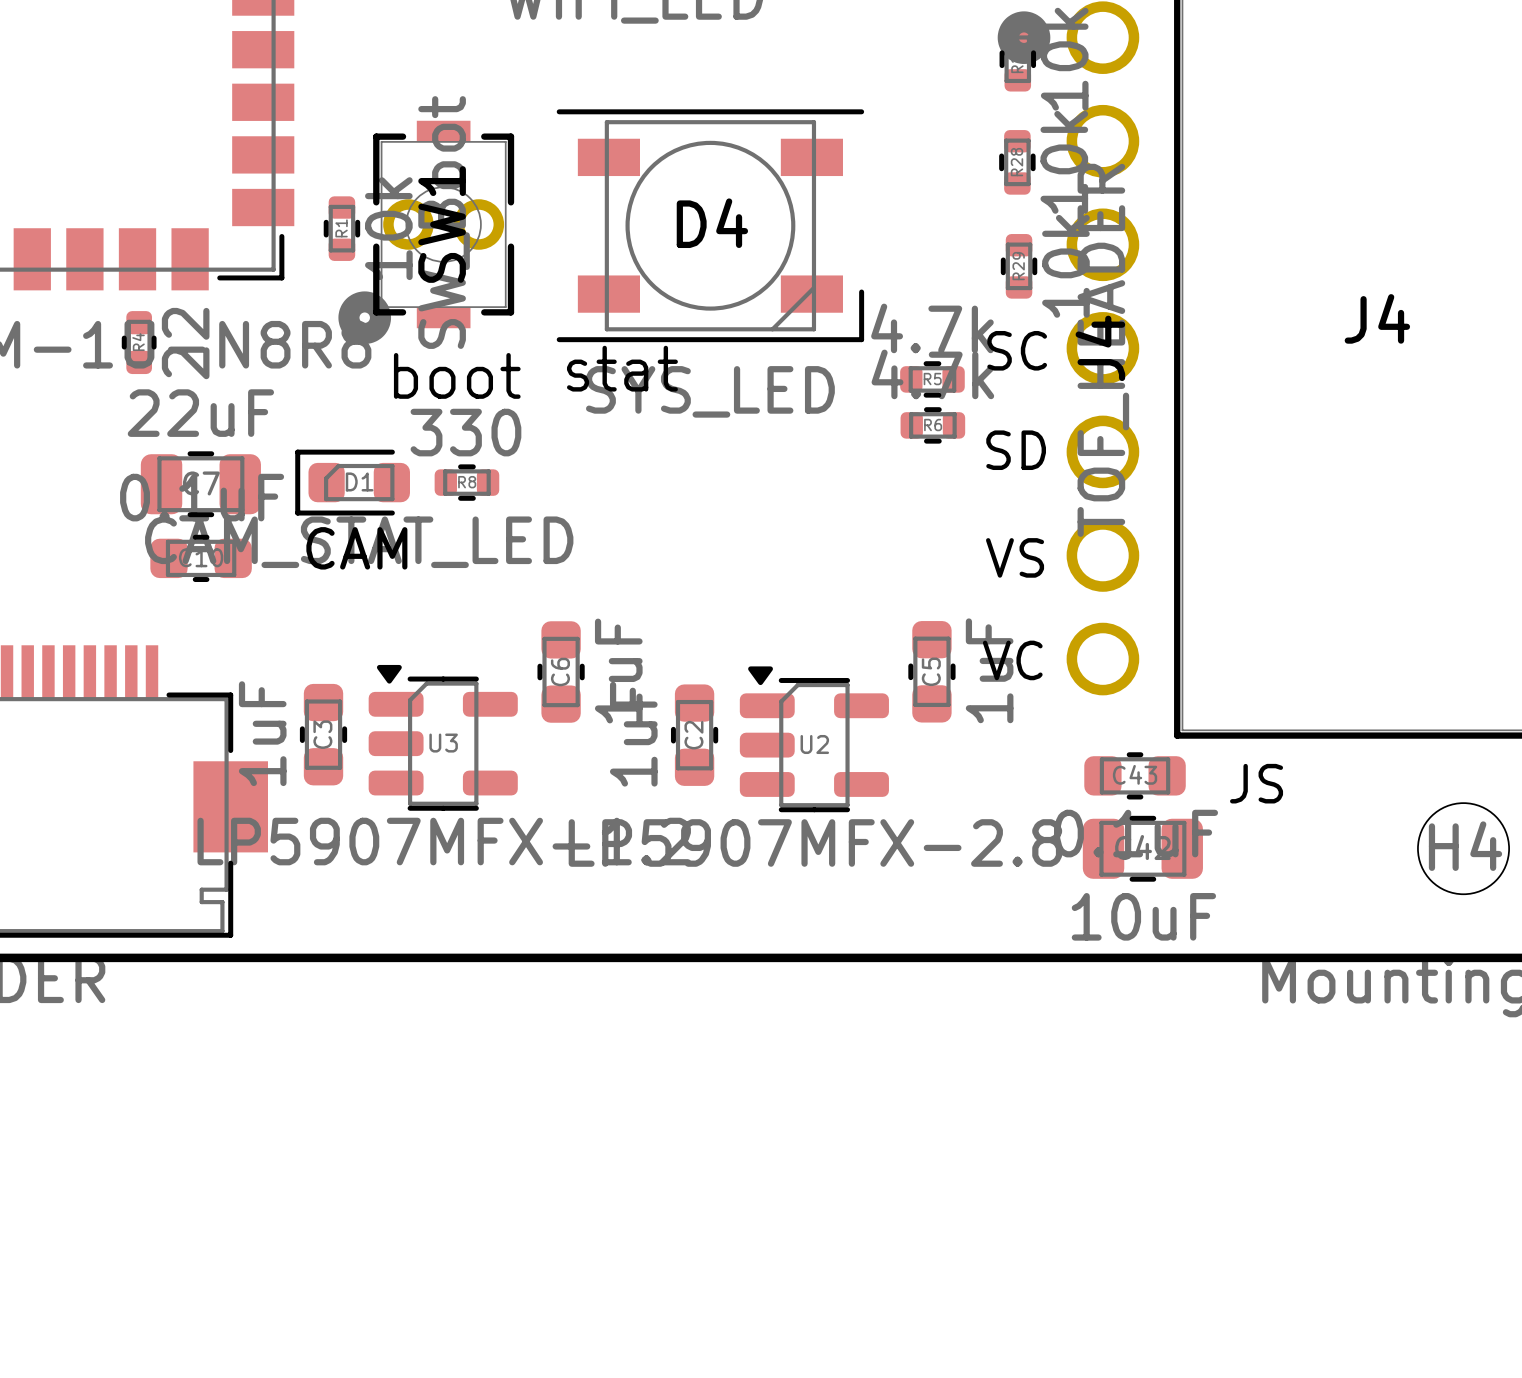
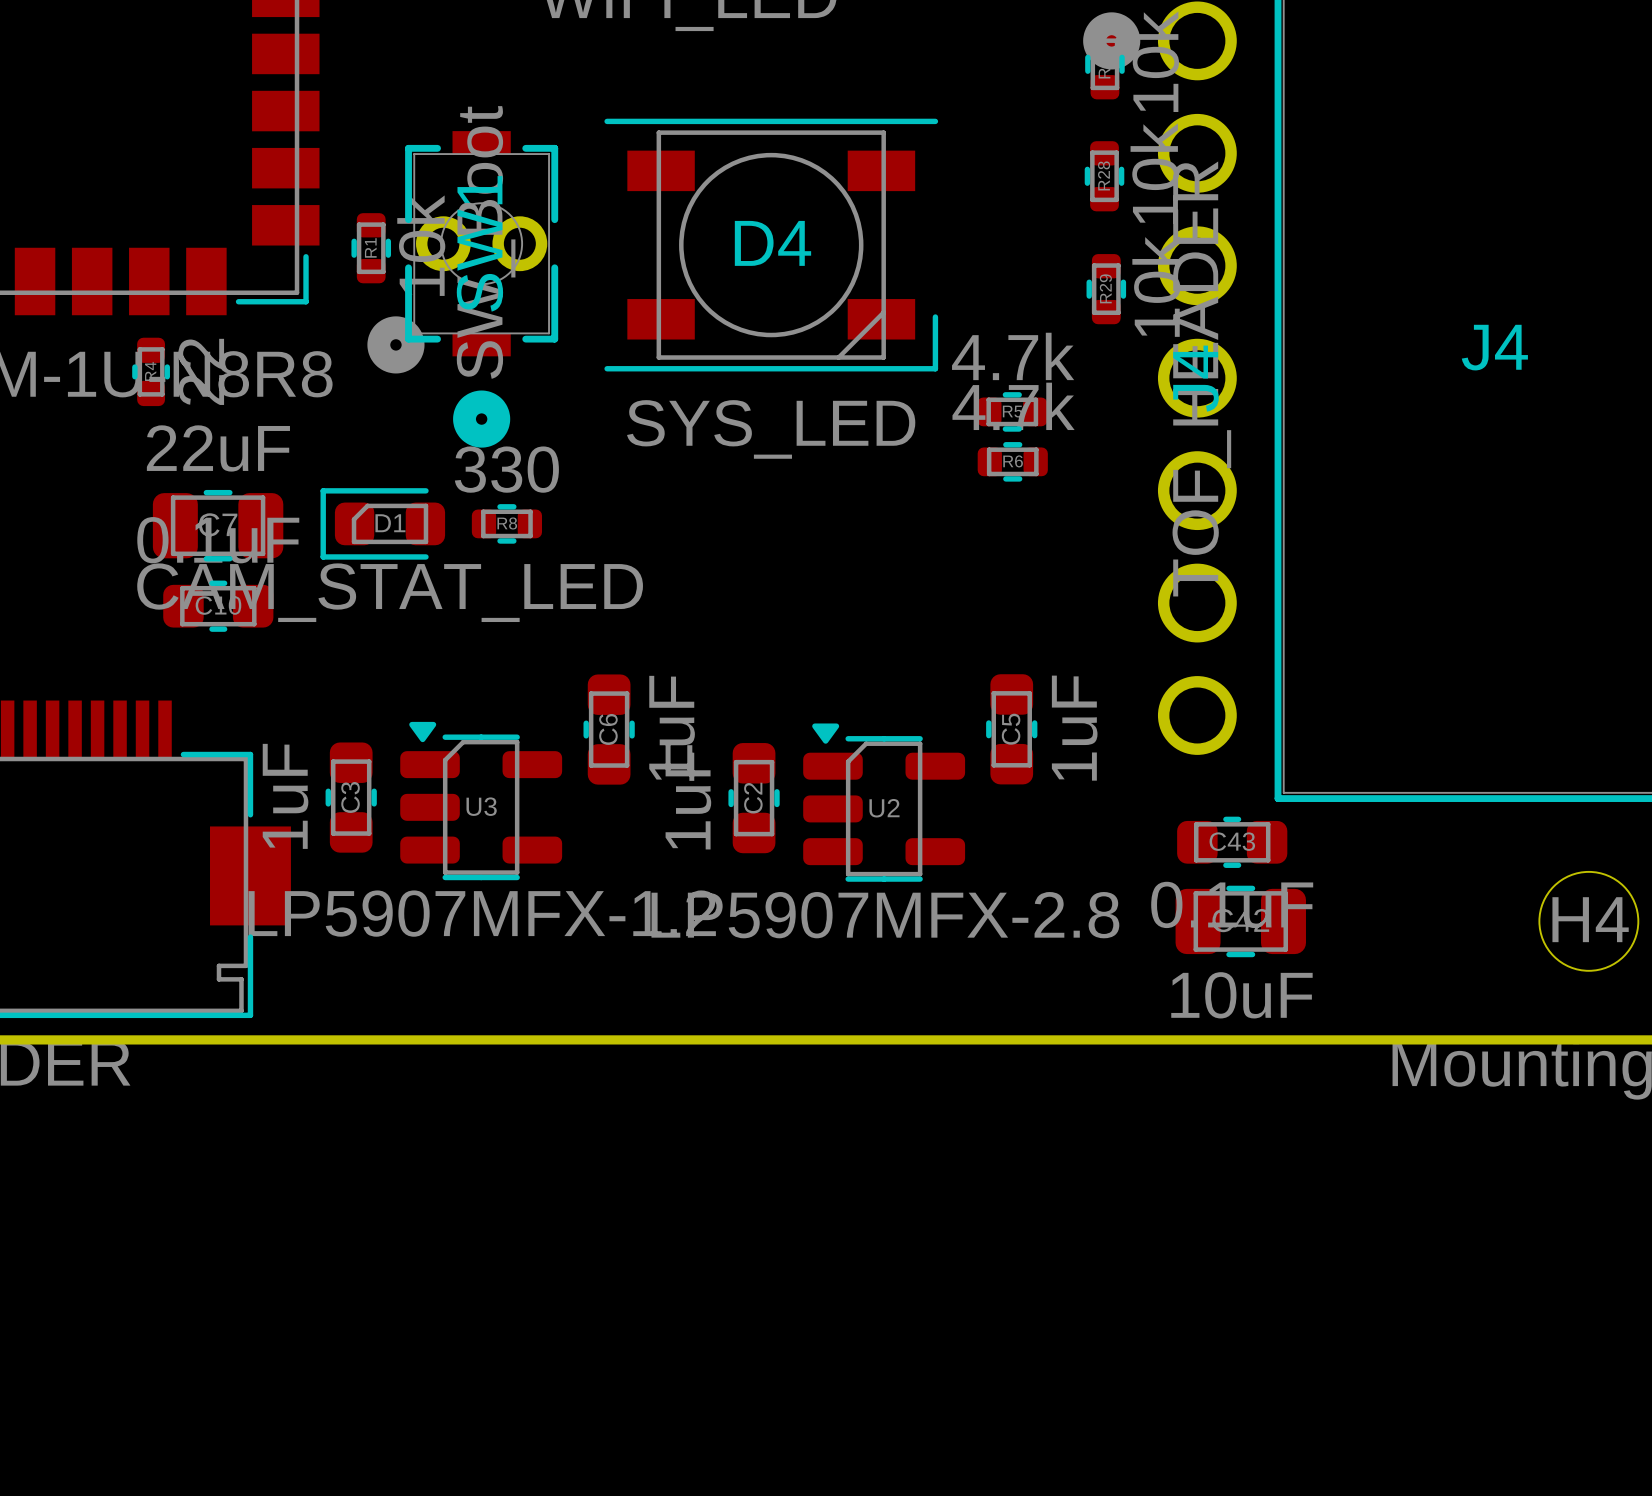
SW1 footprint: [338, 120, 515, 345] -> [367, 131, 559, 448]
text: SC (1017, 350) -> none
text: stat (622, 368) -> none
text: boot (457, 375) -> none
text: SD (1016, 450) -> none
text: CAM (356, 548) -> none
text: VS (1015, 557) -> none
text: VC (1012, 660) -> none
text: JS (1256, 783) -> none

